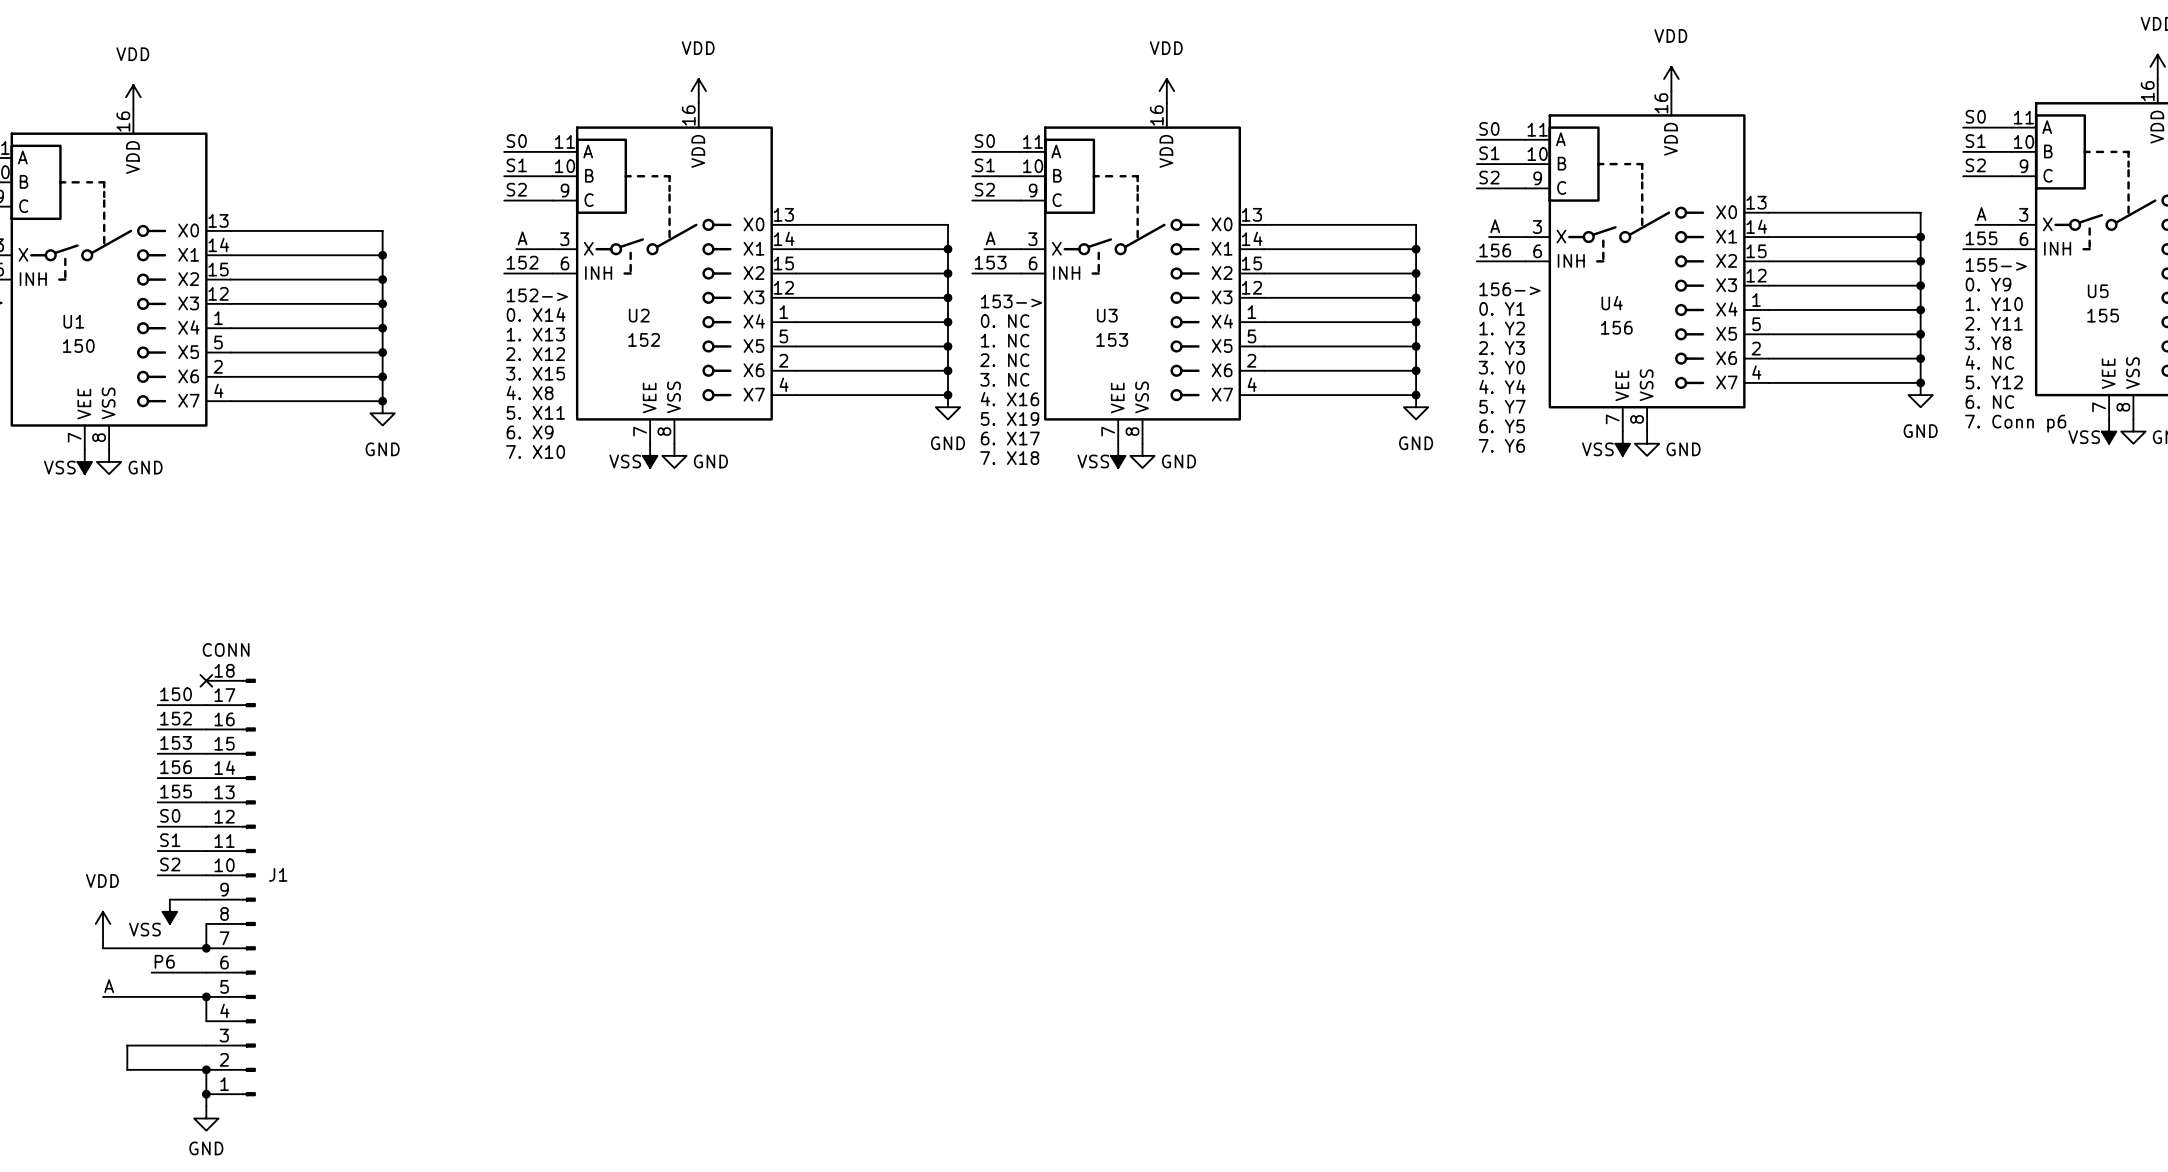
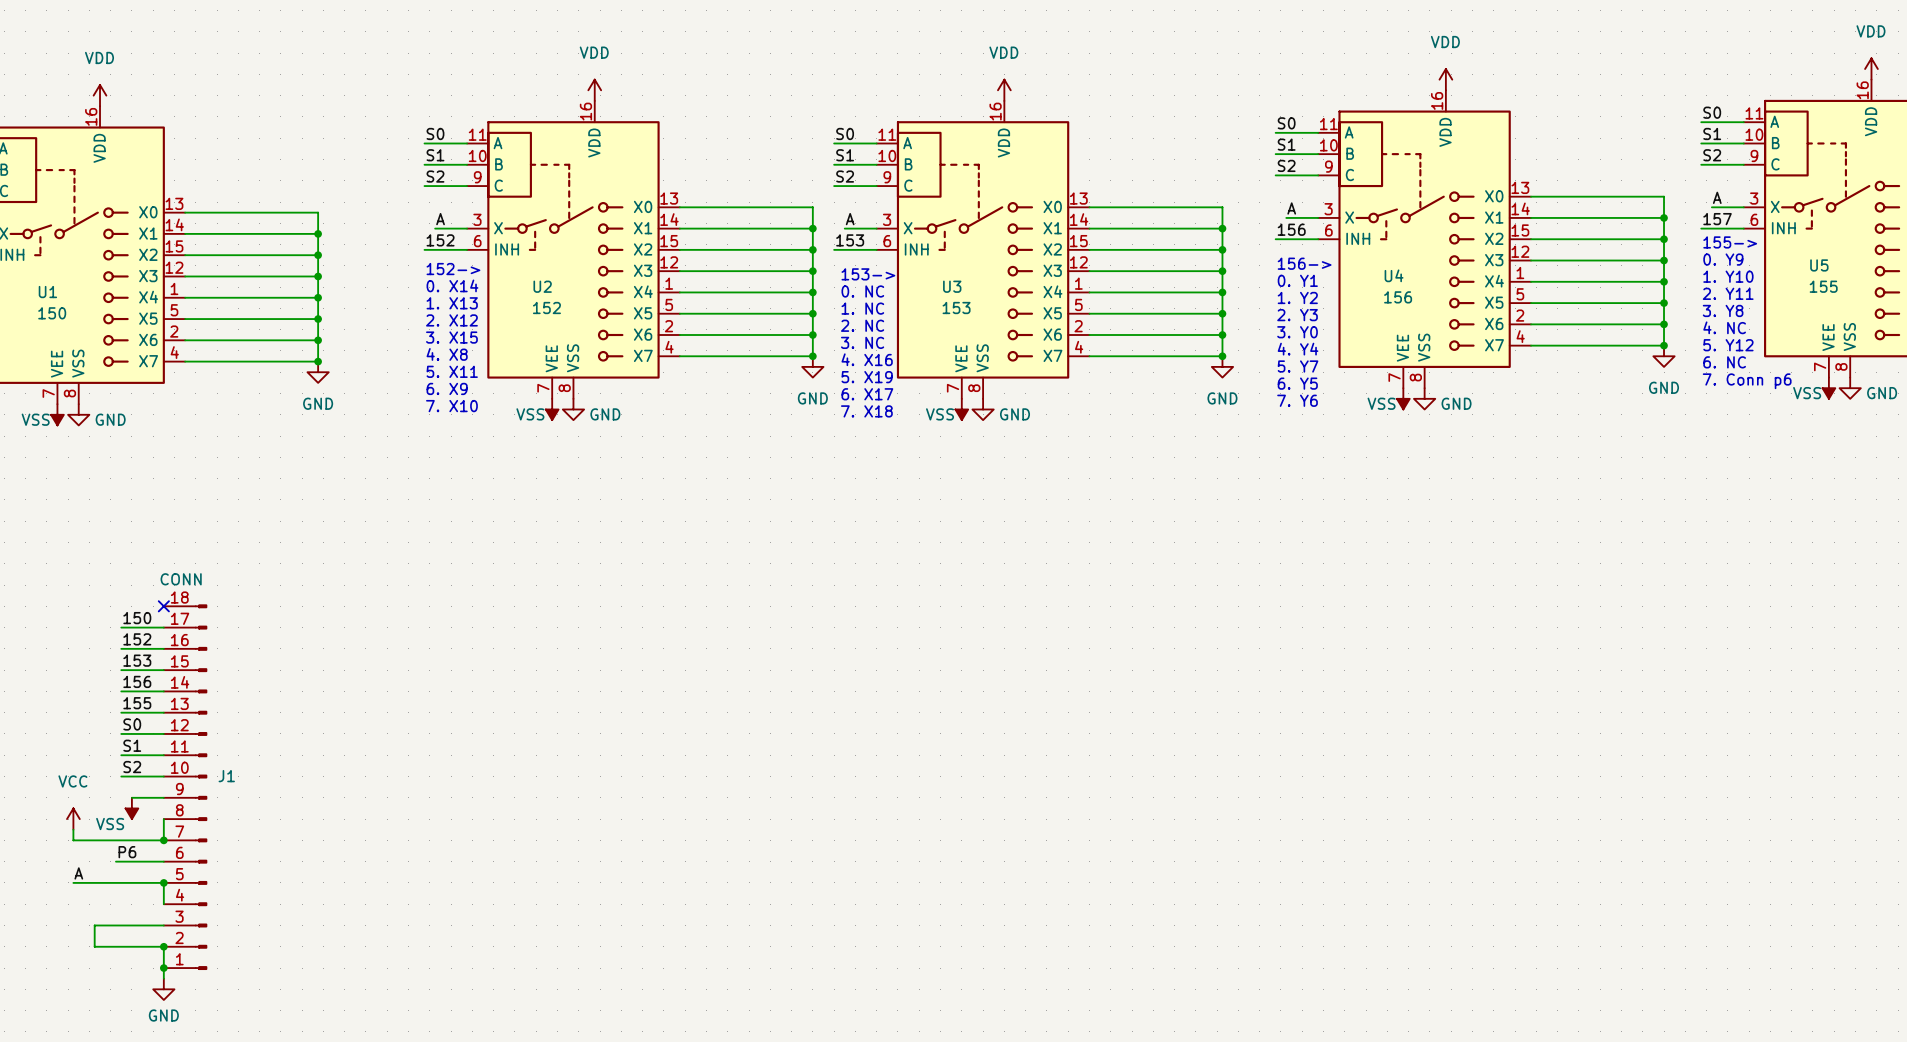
label: 155 (1981, 238) -> 157 (1717, 219)
power symbol: VDD (103, 923) -> VCC (73, 819)

